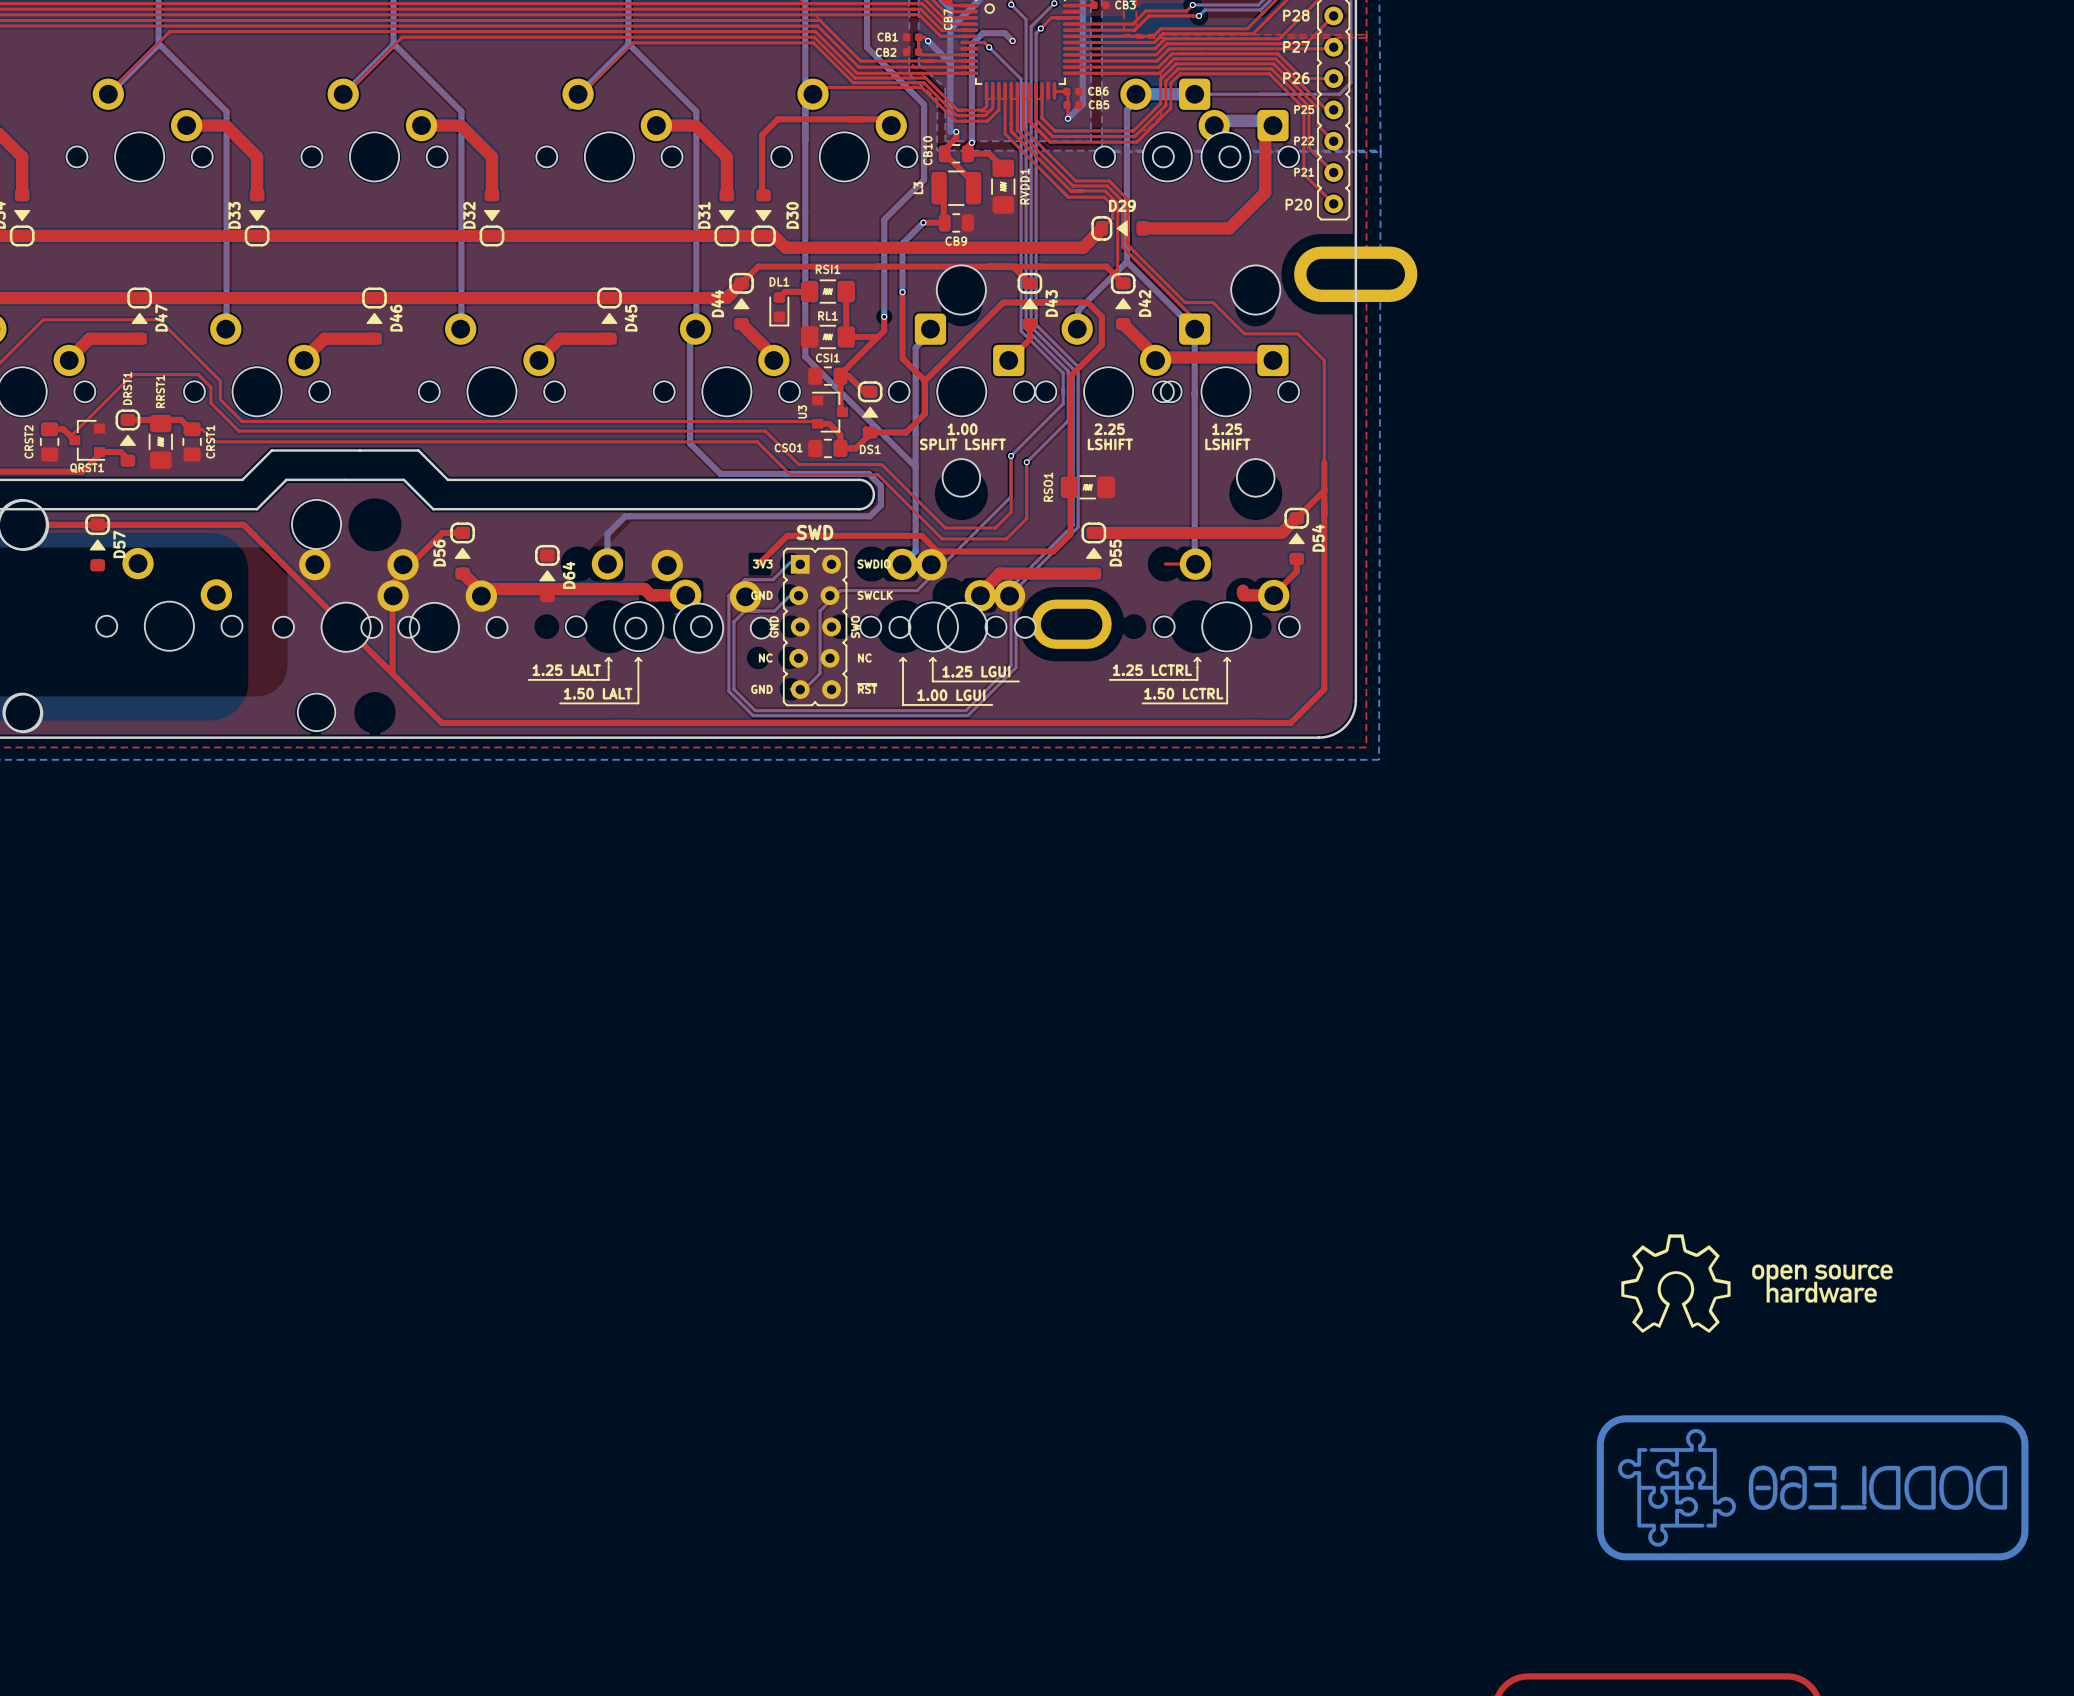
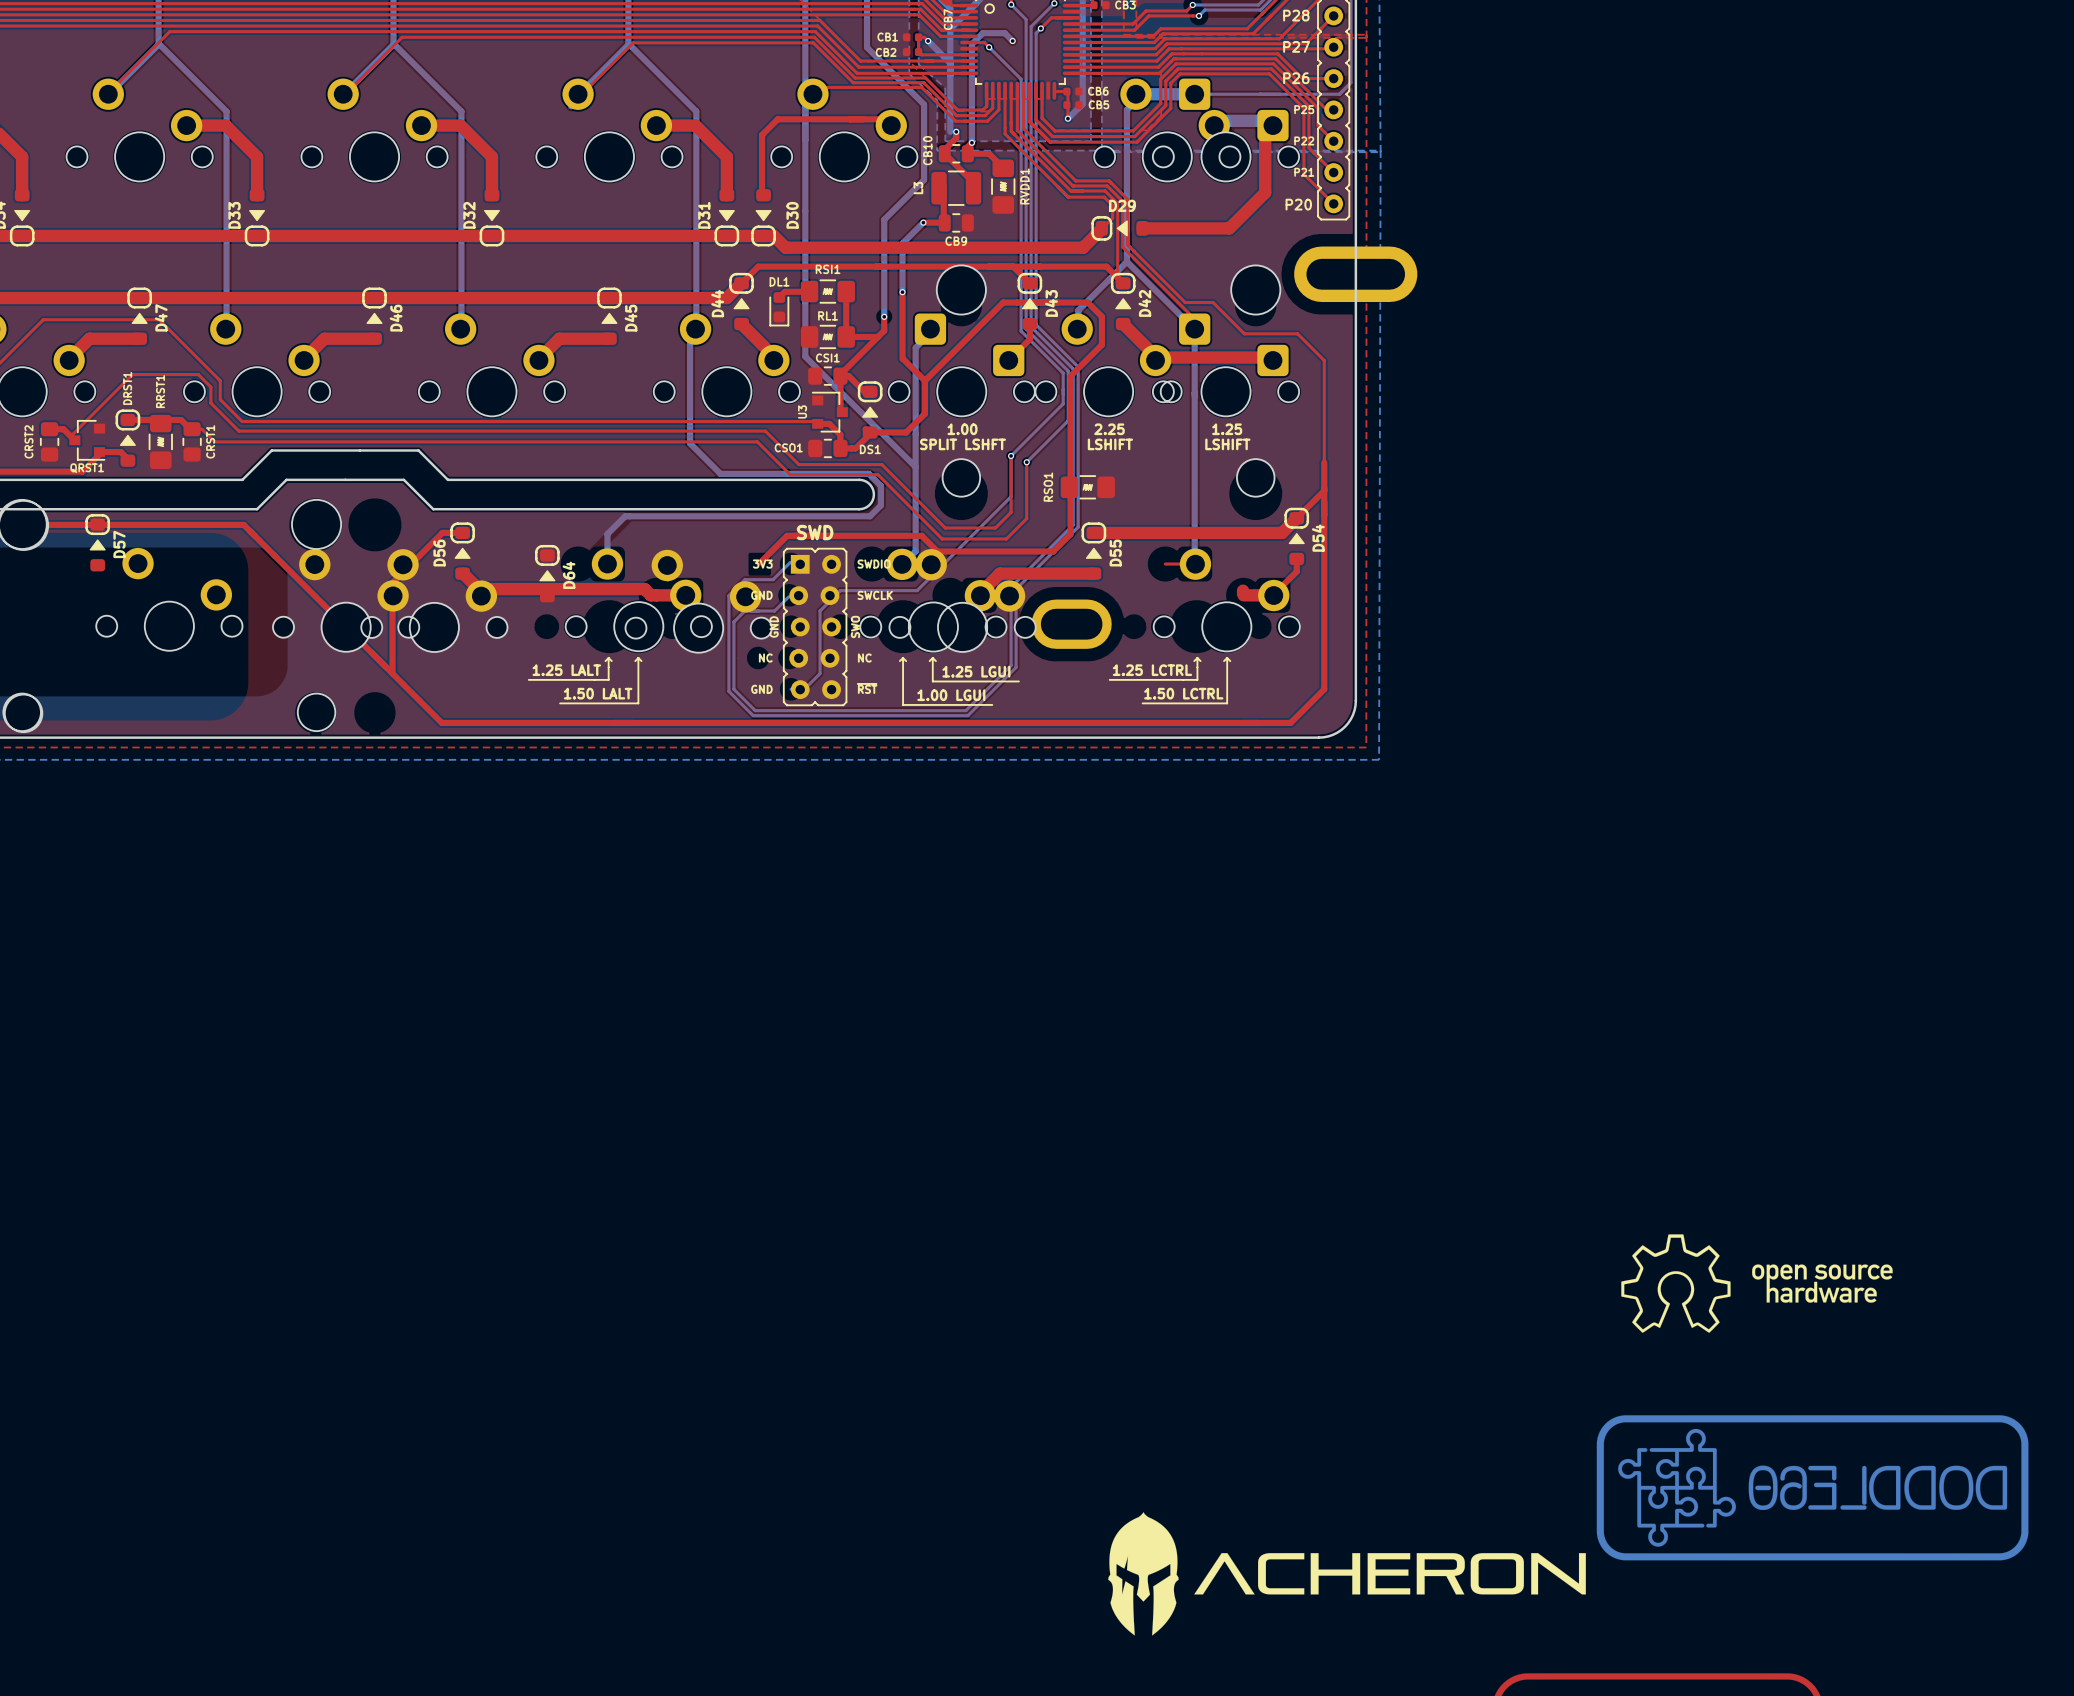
drawing: none -> [1108, 1512, 1586, 1636]

